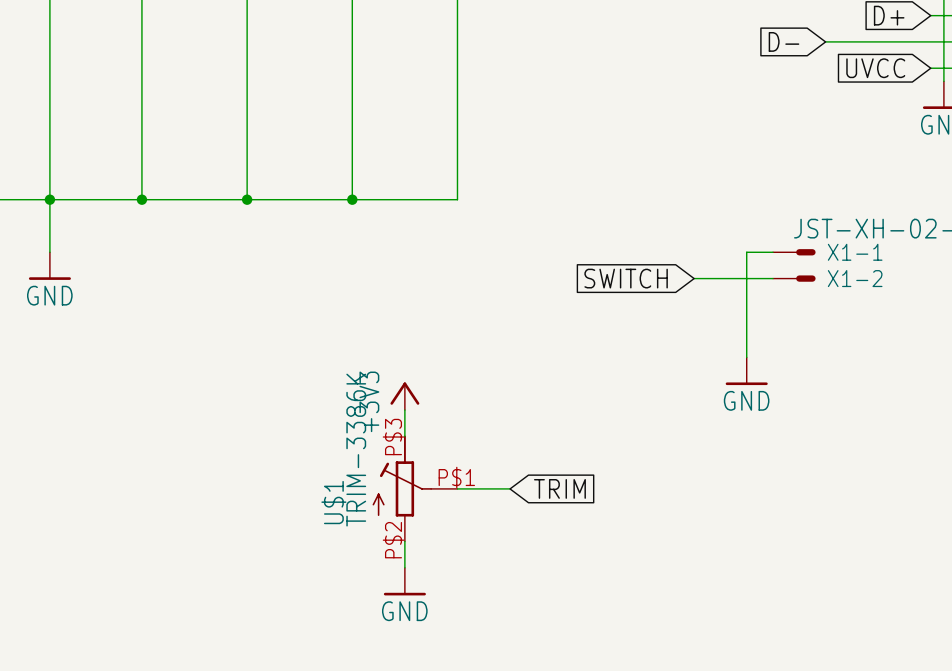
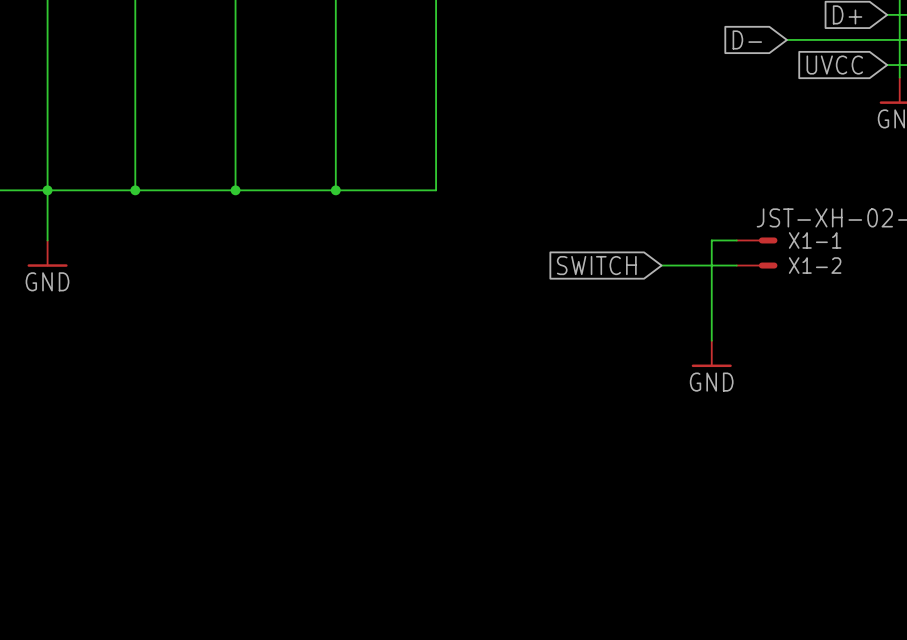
power symbol: +3V3 (404, 396) -> none
wire: (404, 410) (404, 436) -> none
U$1: TRIM-3386K (415, 488) -> none
wire: (457, 488) (510, 488) -> none
global label: TRIM (559, 488) -> none
wire: (404, 541) (404, 567) -> none
power symbol: GND (404, 581) -> none

